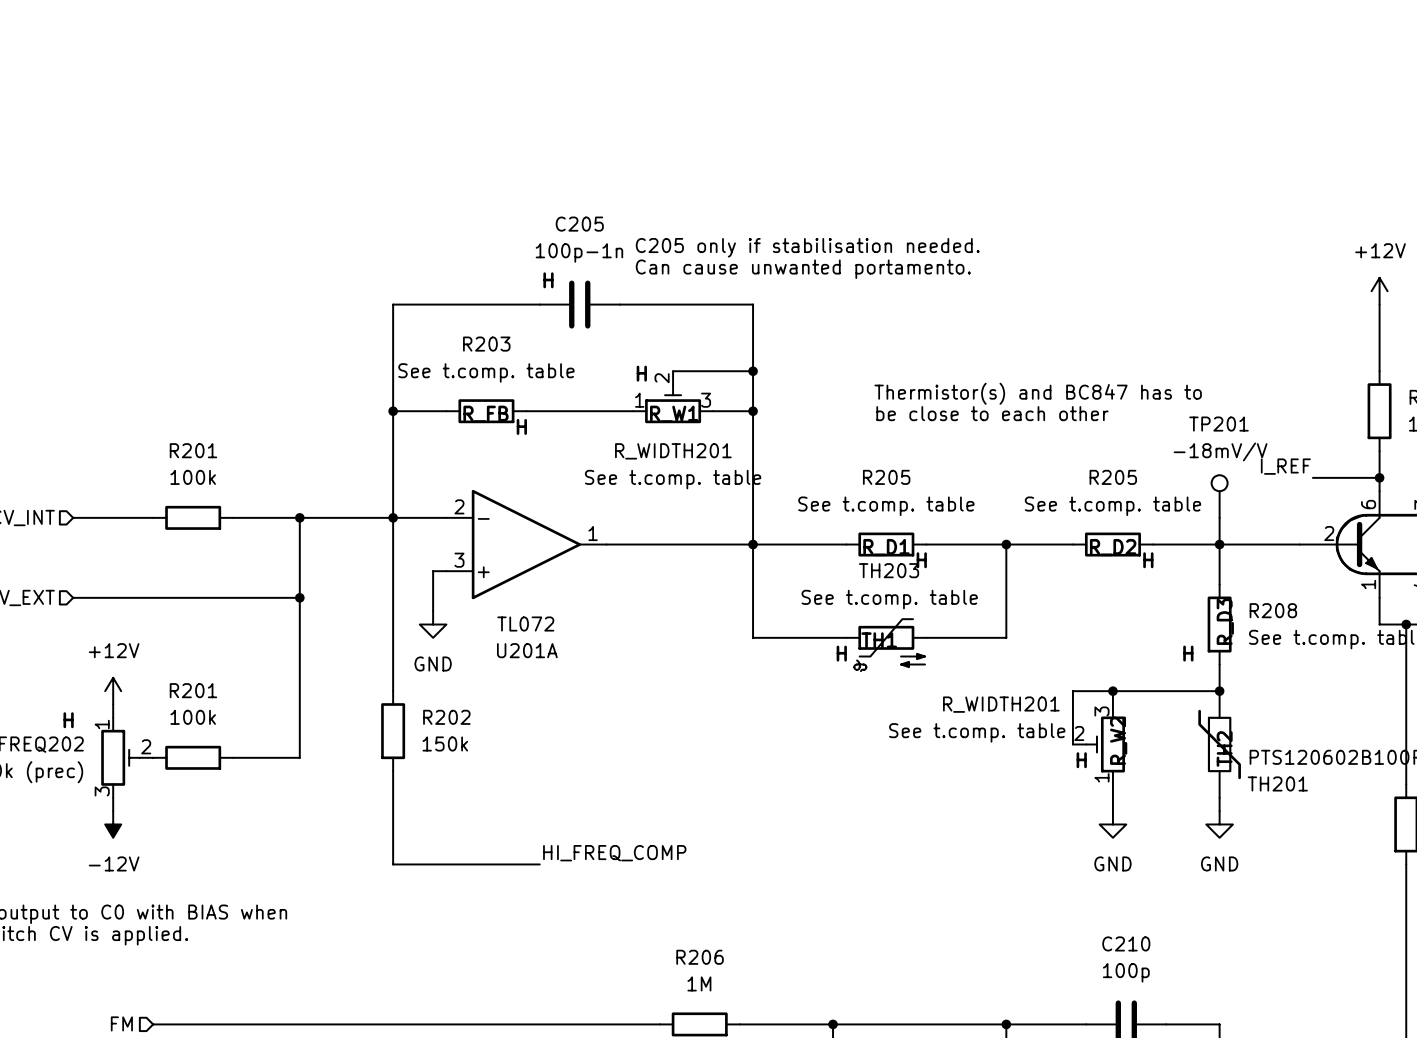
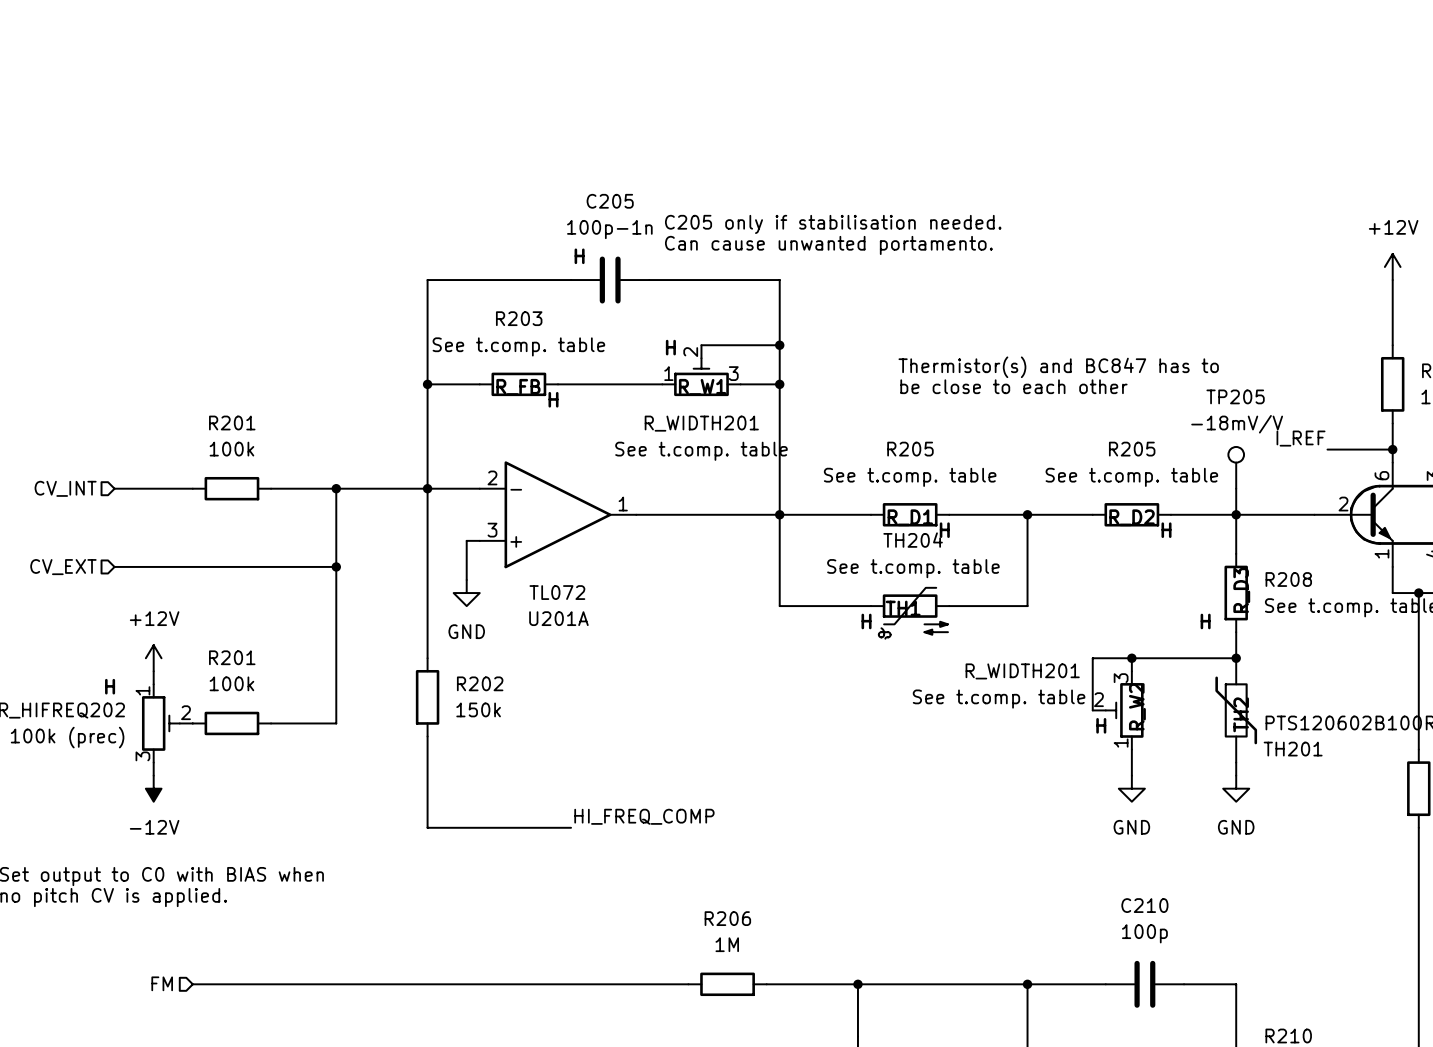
TP201 name: TP201 (1218, 424) -> TP205 (1235, 396)
TH203 name: TH203 (889, 570) -> TH204 (913, 540)

